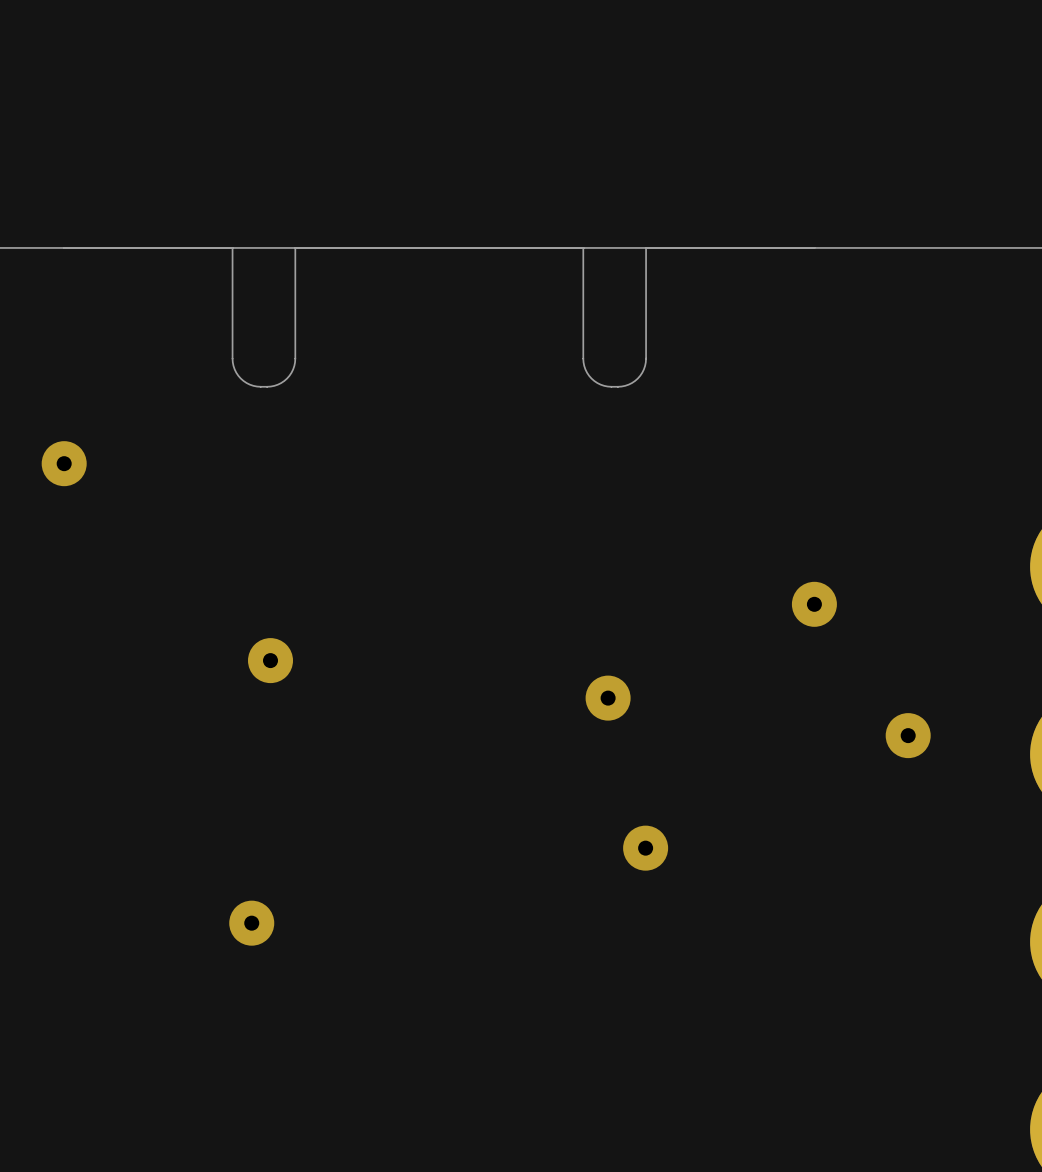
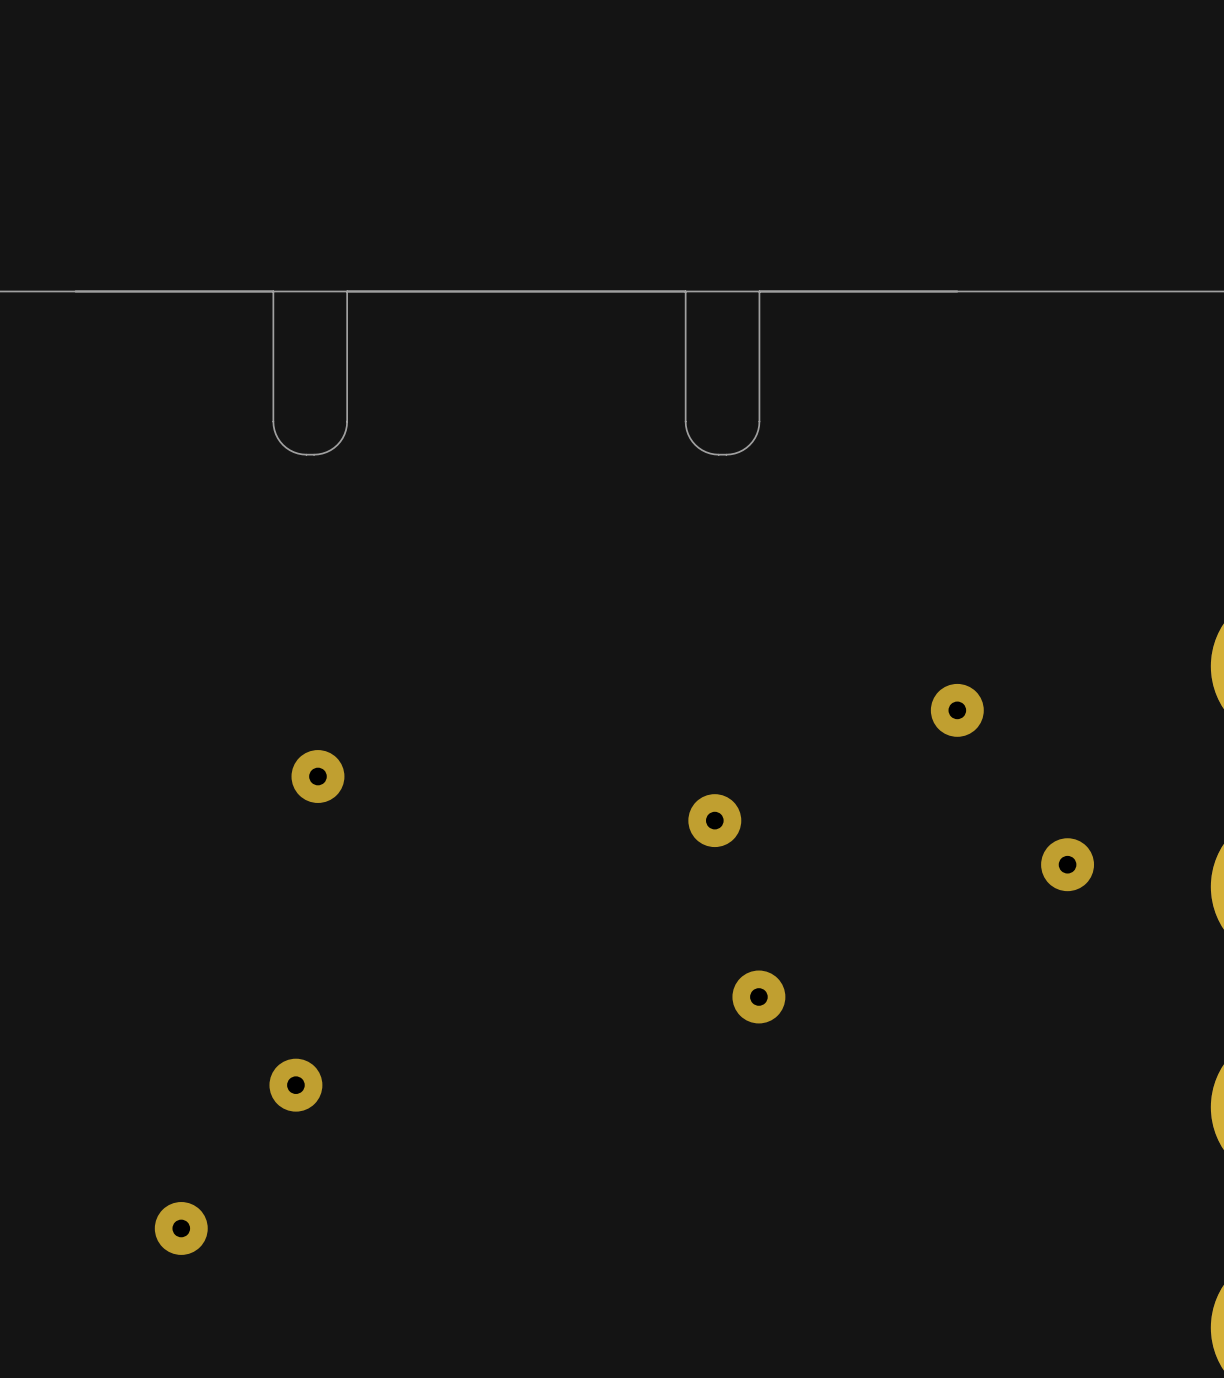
via: (64, 463) -> none
via: none -> (181, 1228)

